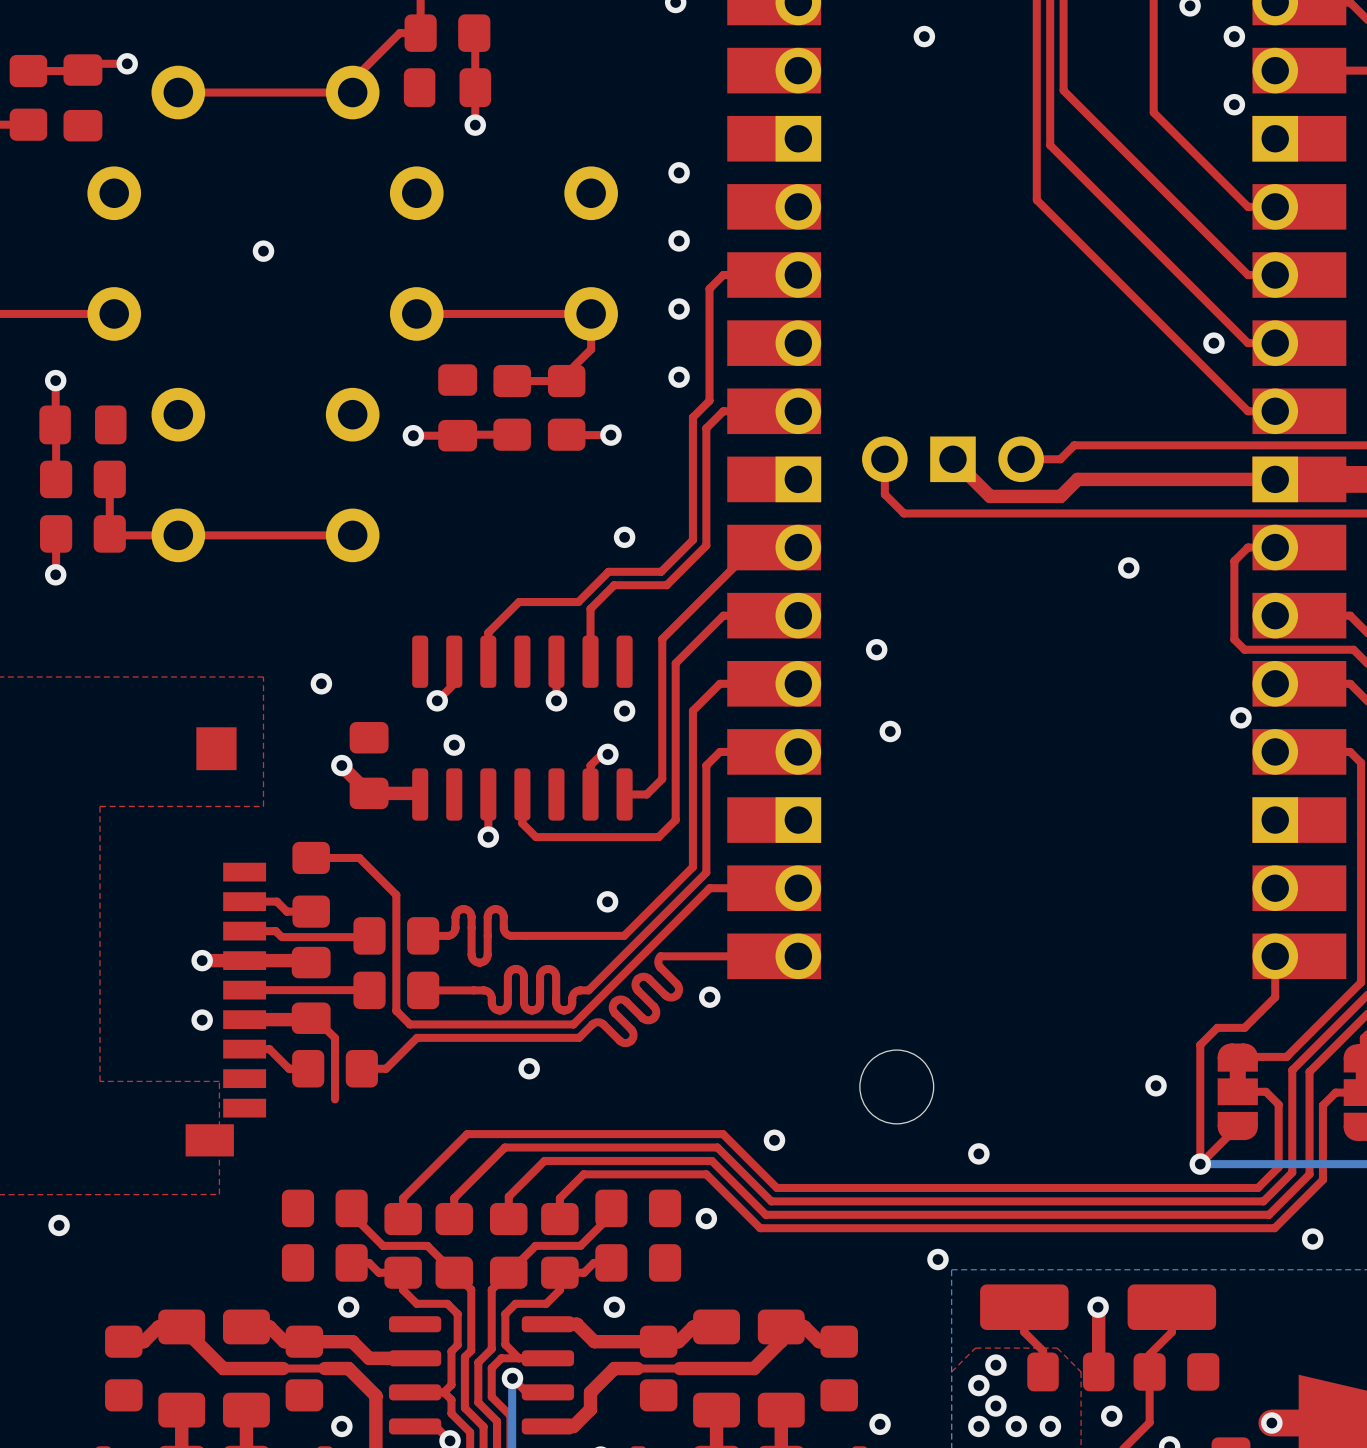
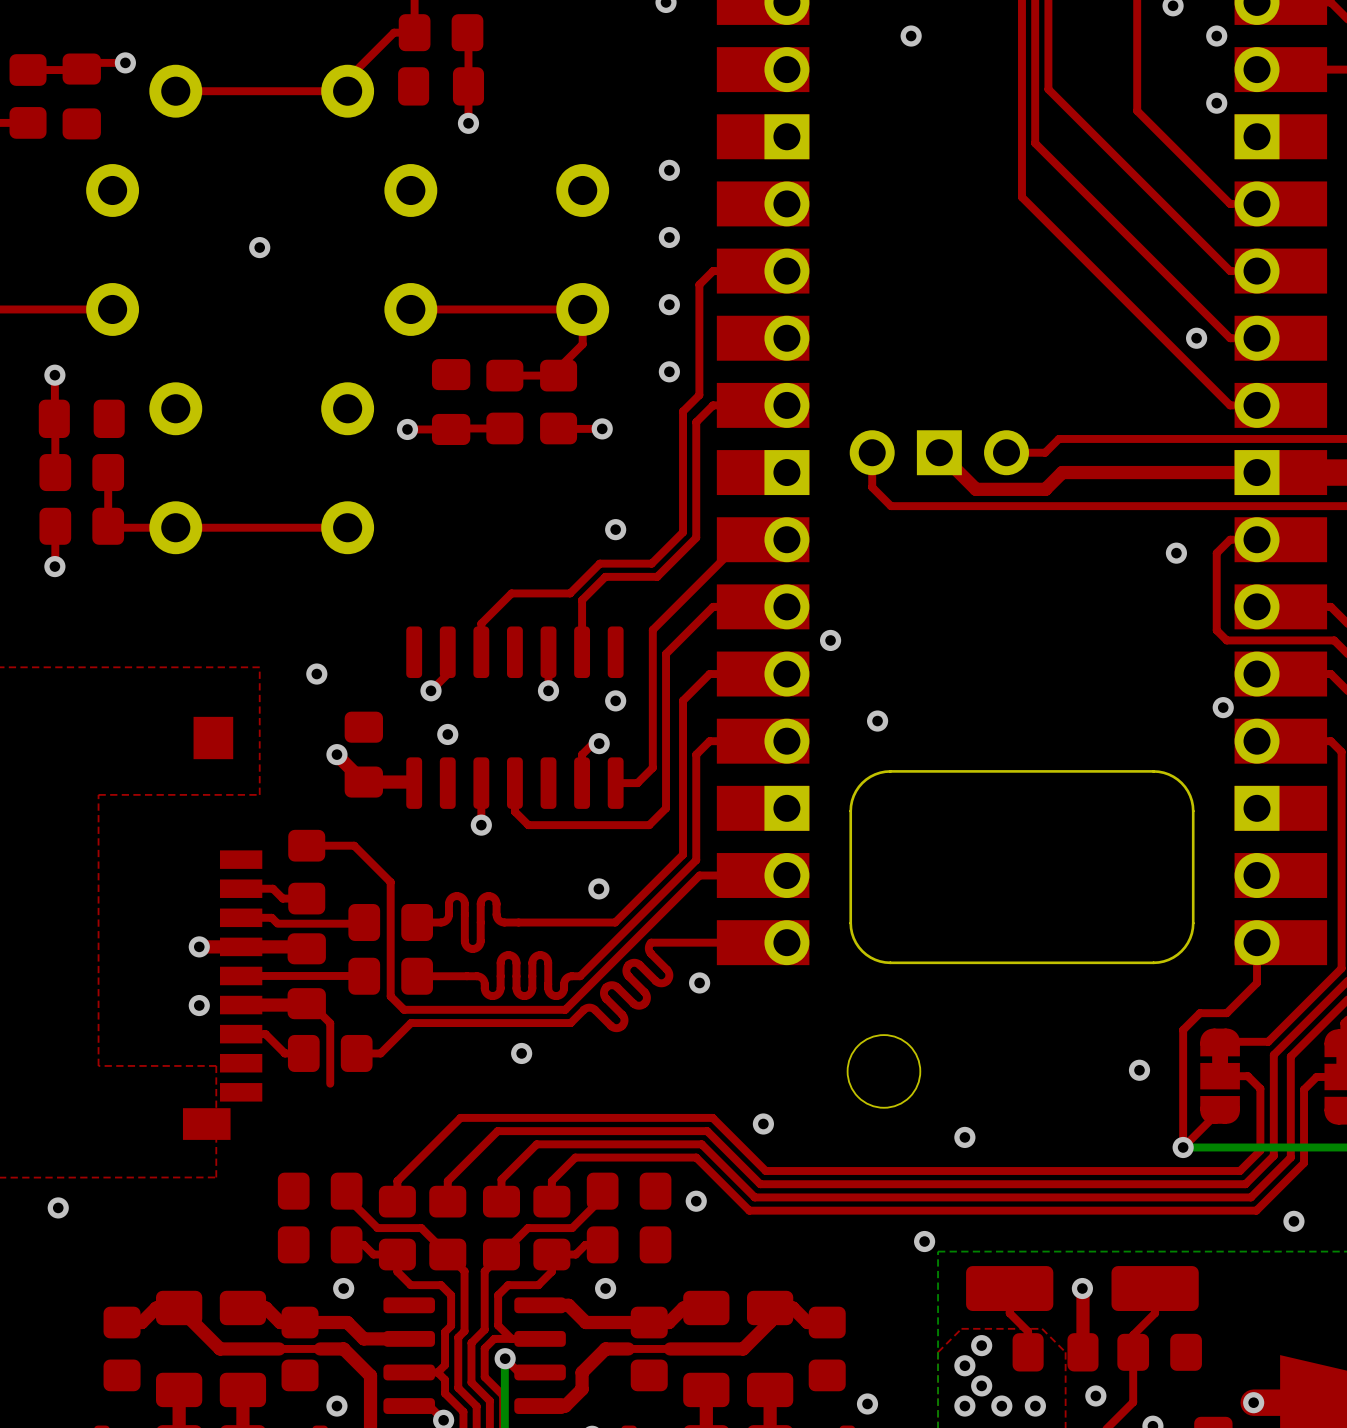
via position: (1128, 567) -> (1176, 553)
via position: (876, 649) -> (830, 640)
board edge: none -> (1153, 771) (890, 771) (870, 776) (856, 791) (851, 805) (850, 923) (856, 942) (870, 957) (890, 962) (1153, 962) (1173, 957) (1185, 947) (1192, 928) (1192, 805) (1187, 791) (1181, 783) (1168, 774) (1153, 771)

